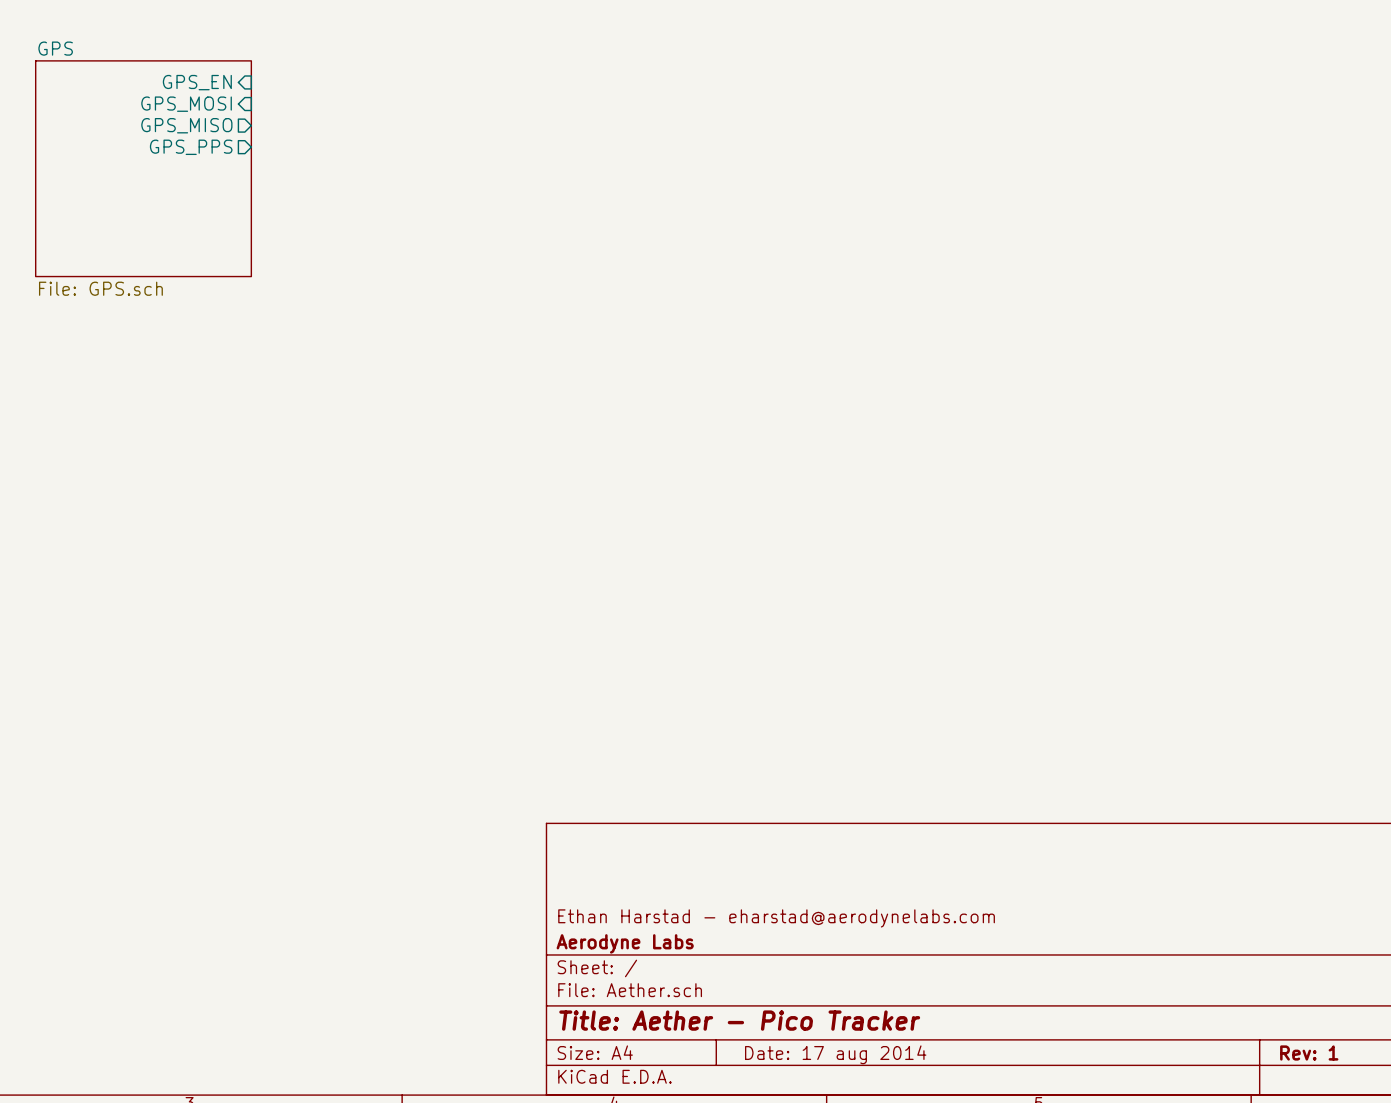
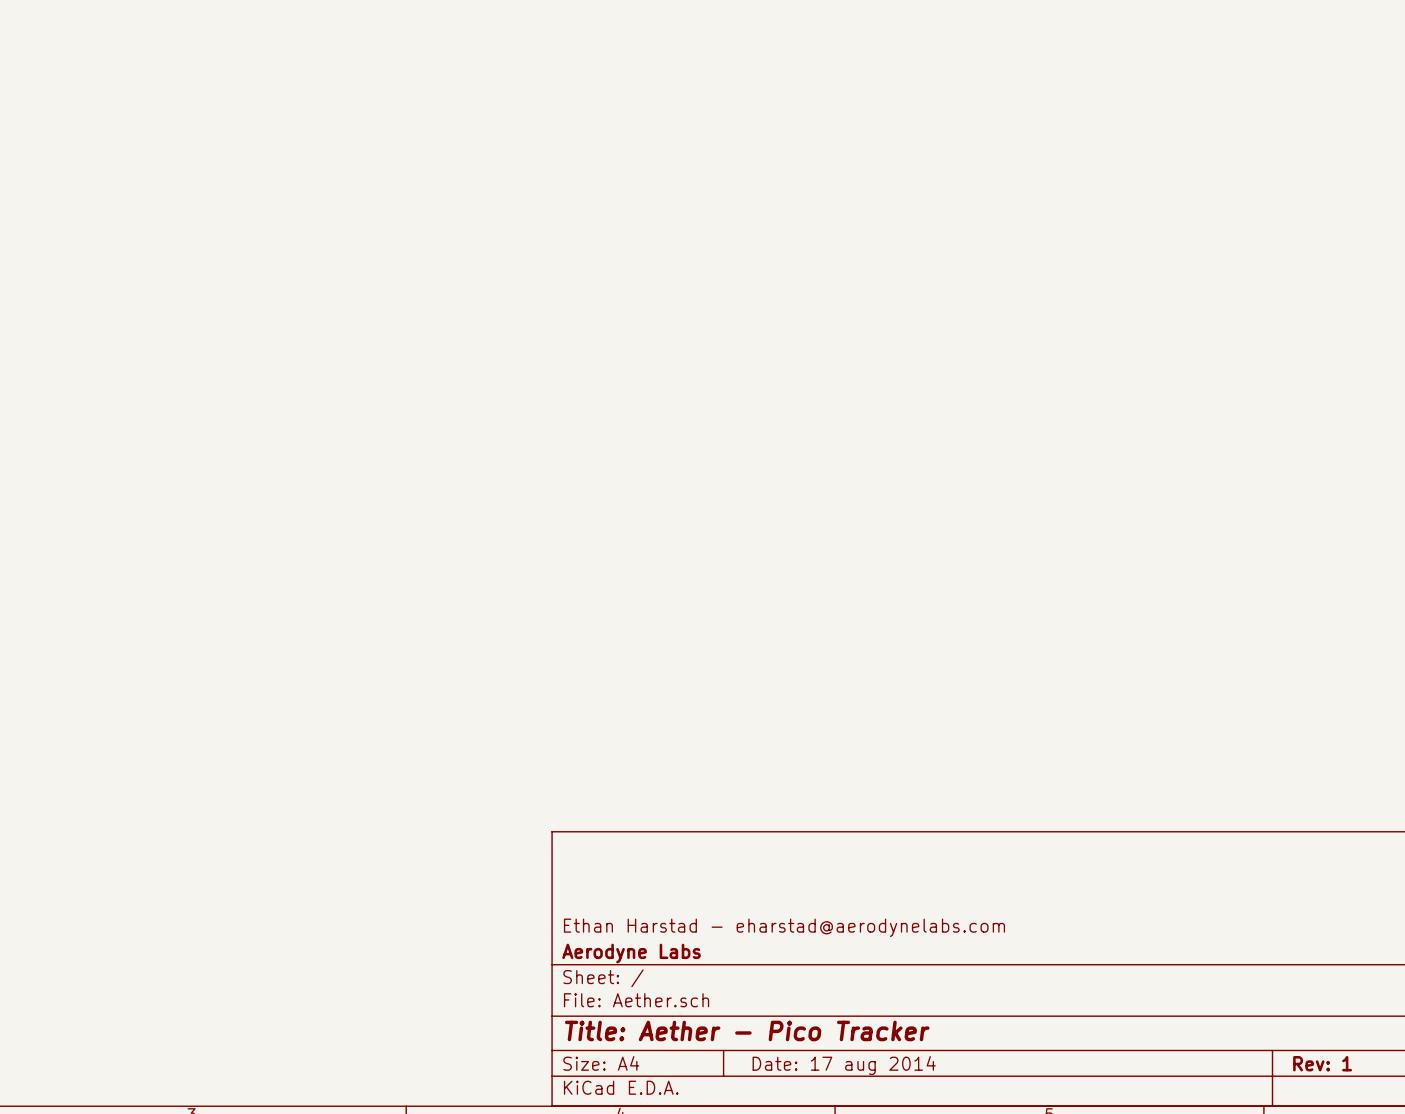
sheet pin: GPS_EN (197, 82) -> none
sheet pin: GPS_MOSI (186, 104) -> none
sheet pin: GPS_MISO (186, 125) -> none
sheet pin: GPS_PPS (191, 147) -> none
sheet GPS: File: GPS.sch (143, 168) -> none

